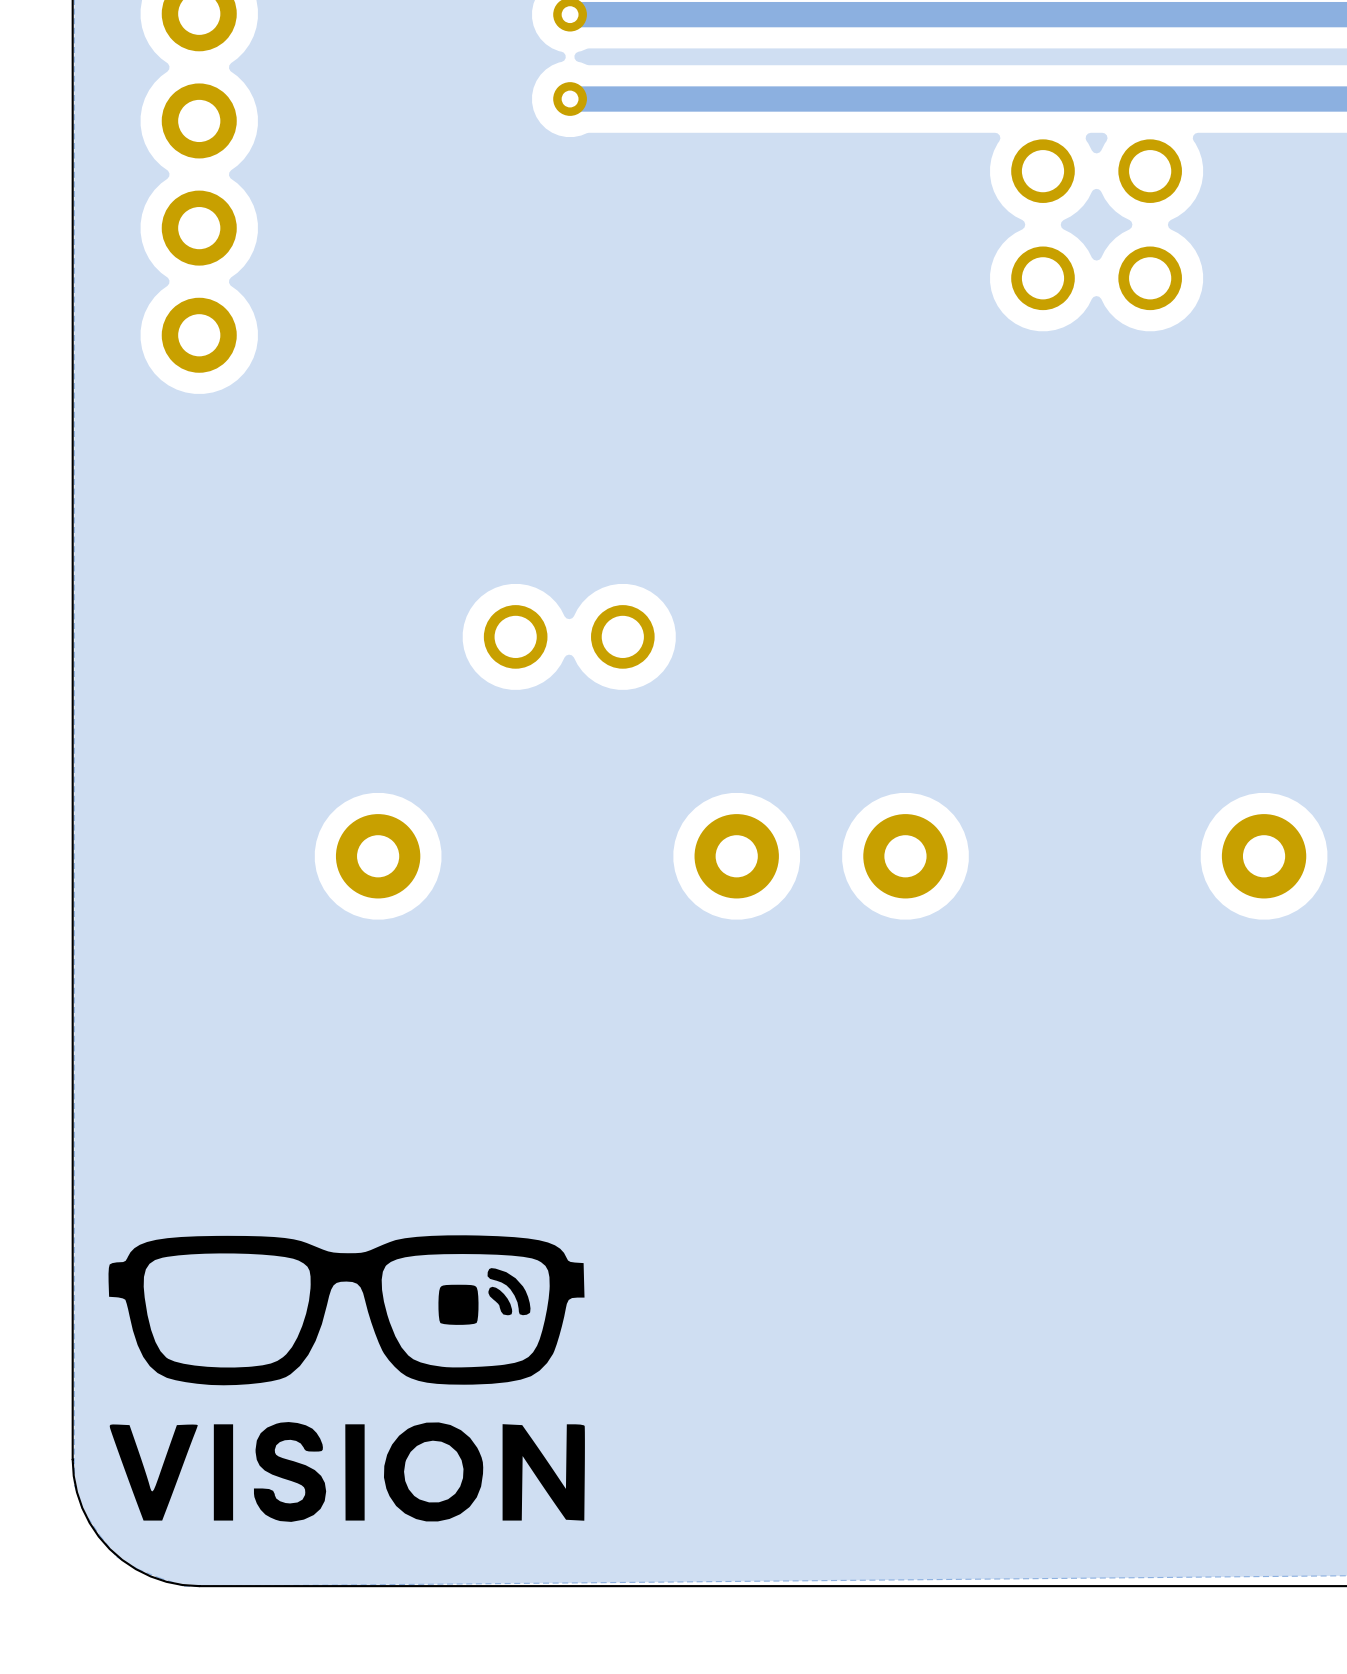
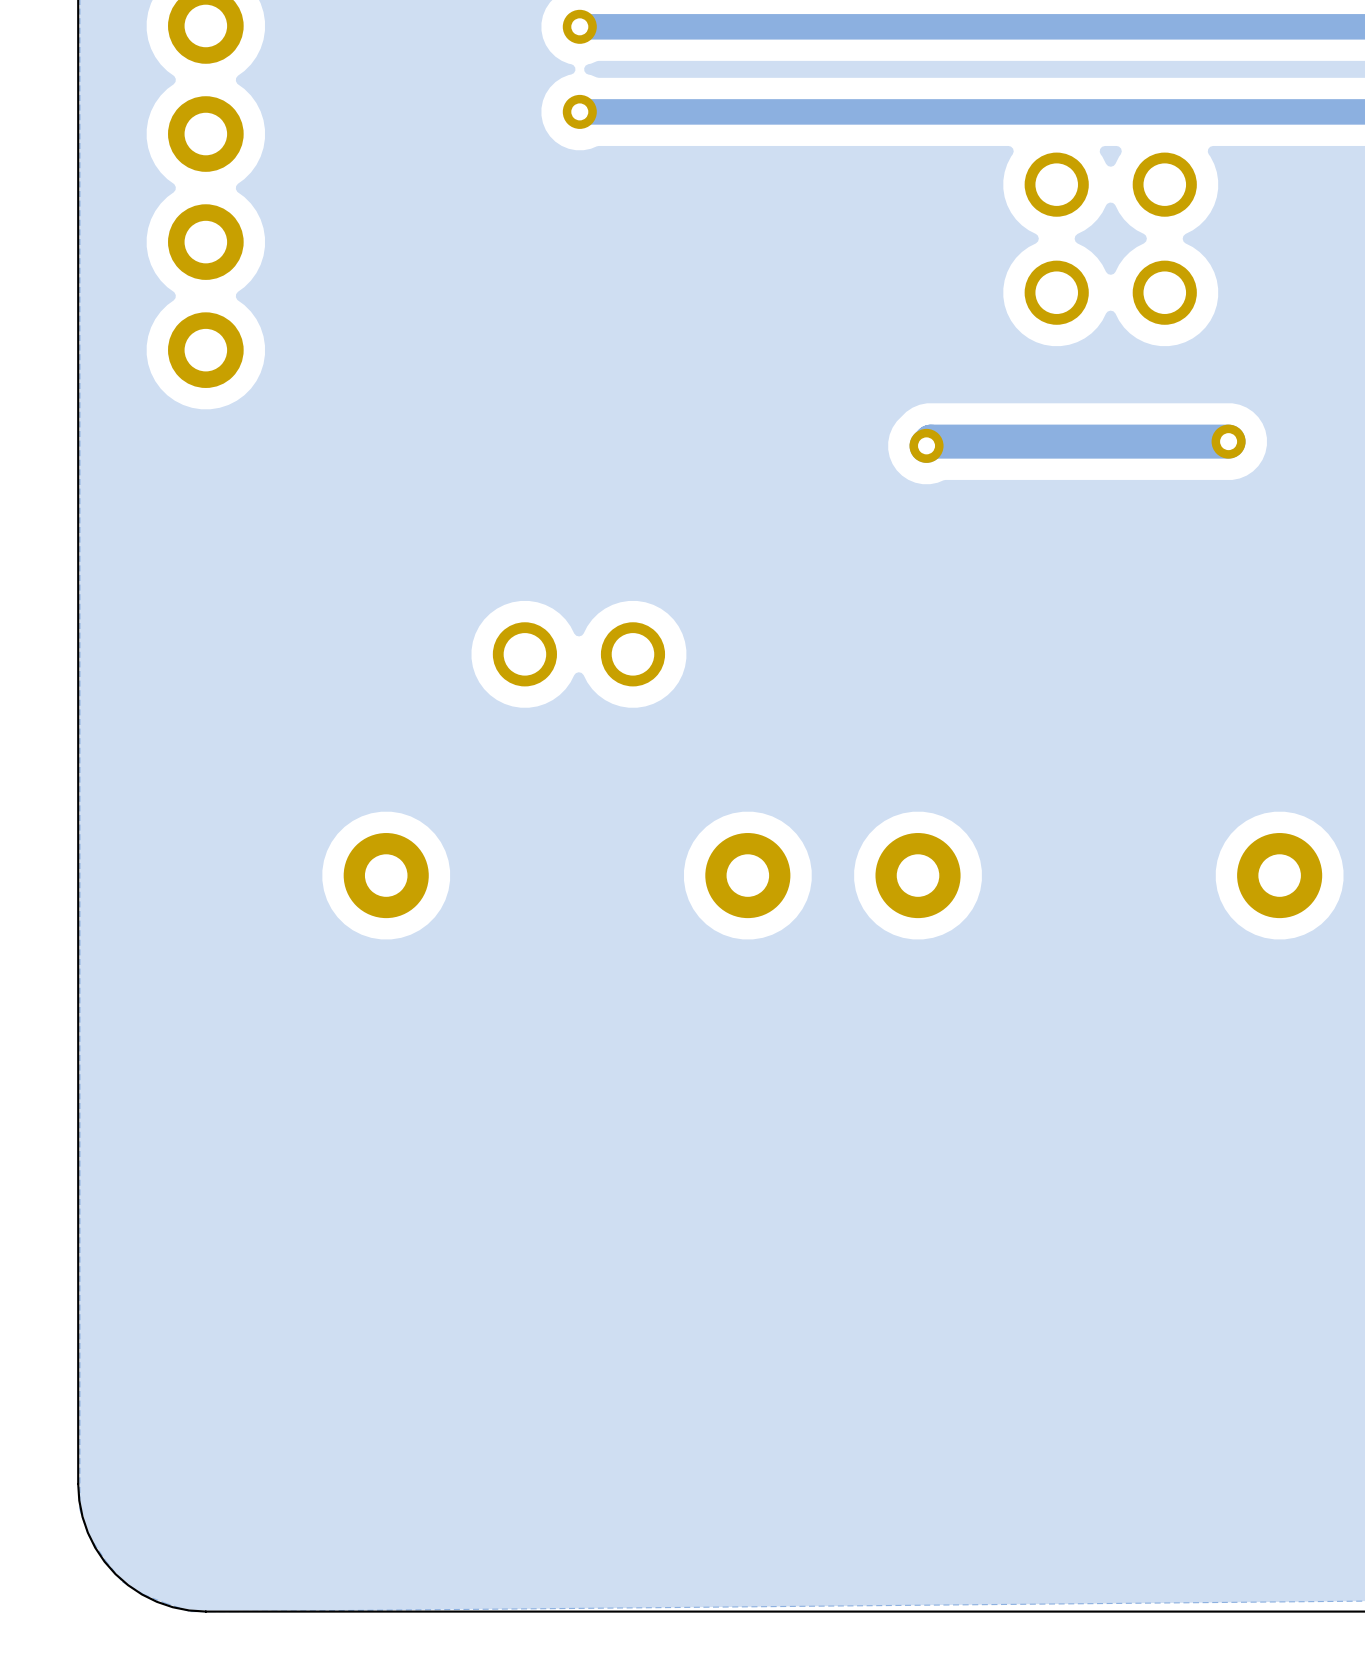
track: none -> (1228, 441) (930, 441) (926, 445)
part: none -> (1228, 441)
part: none -> (926, 445)
drawing: [108, 1235, 585, 1522] -> none

